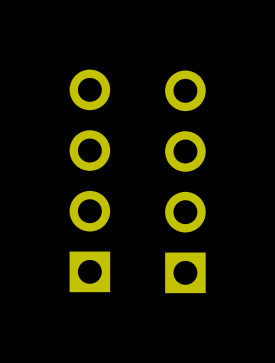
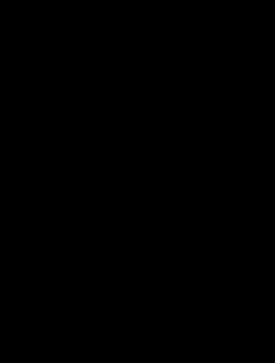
part: (89, 180) -> none
part: (185, 181) -> none

